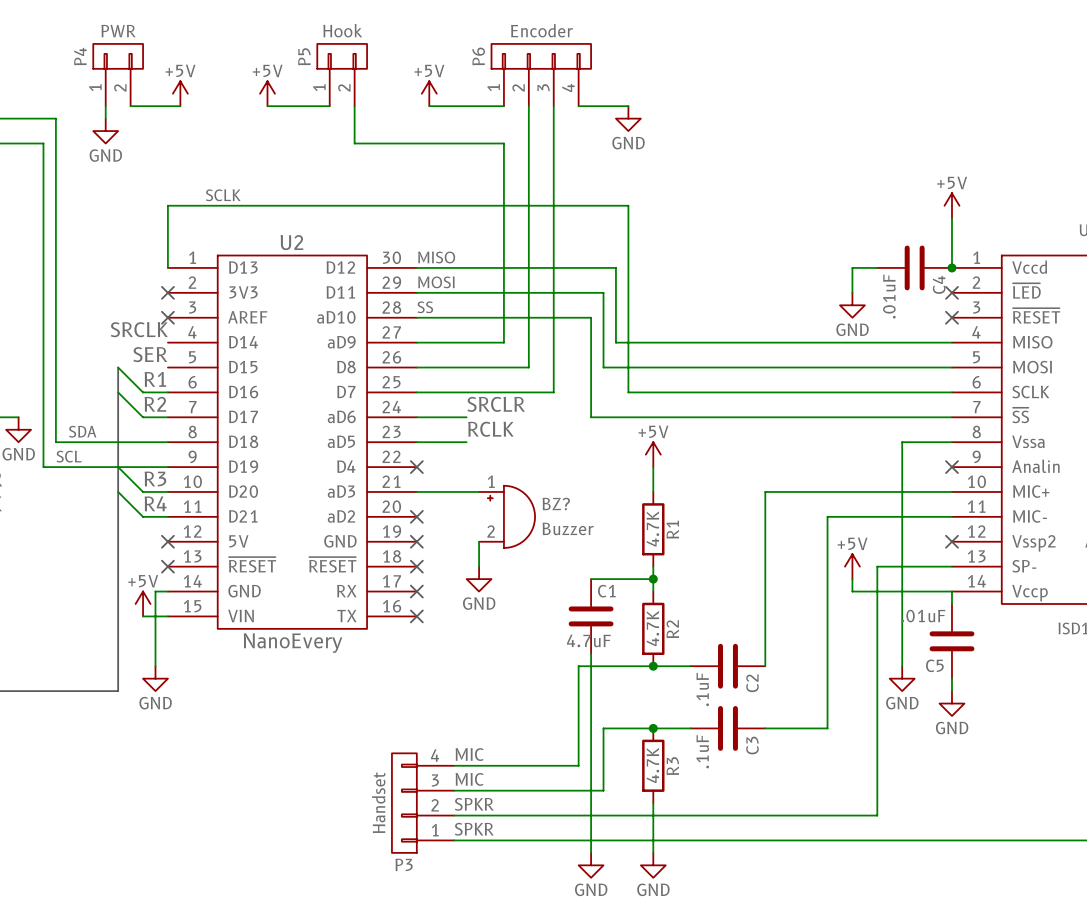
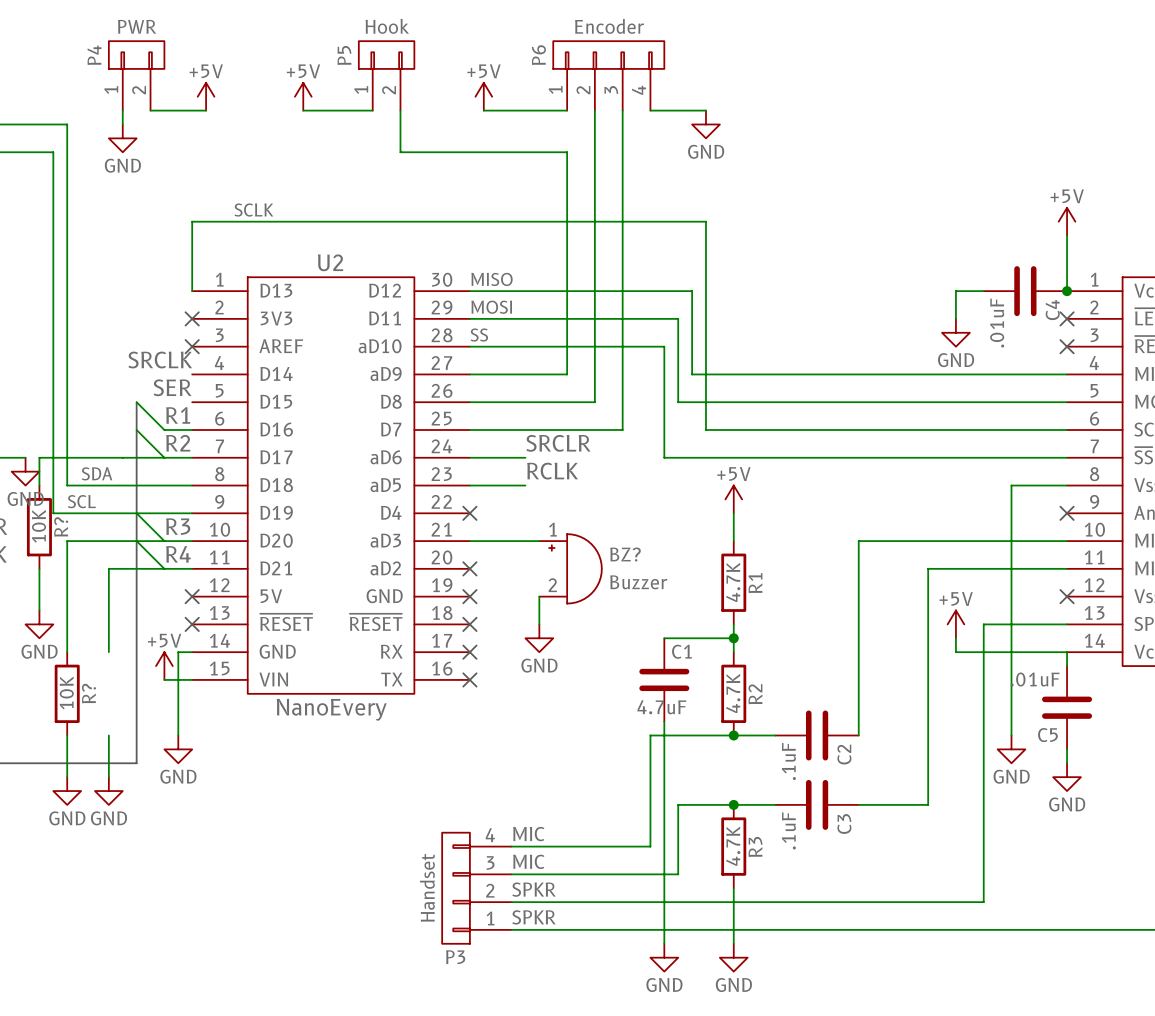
wire: none -> (164, 457) (39, 457) (39, 485)
R?: none -> 10K (39, 527)
wire: none -> (164, 541) (67, 541) (67, 652)
wire: none -> (39, 568) (39, 610)
wire: none -> (164, 568) (108, 568) (108, 652)
power symbol: none -> GND (39, 624)
R?: none -> 10K (67, 693)
wire: none -> (67, 735) (67, 777)
wire: none -> (108, 735) (108, 777)
power symbol: none -> GND (67, 791)
power symbol: none -> GND (108, 791)

